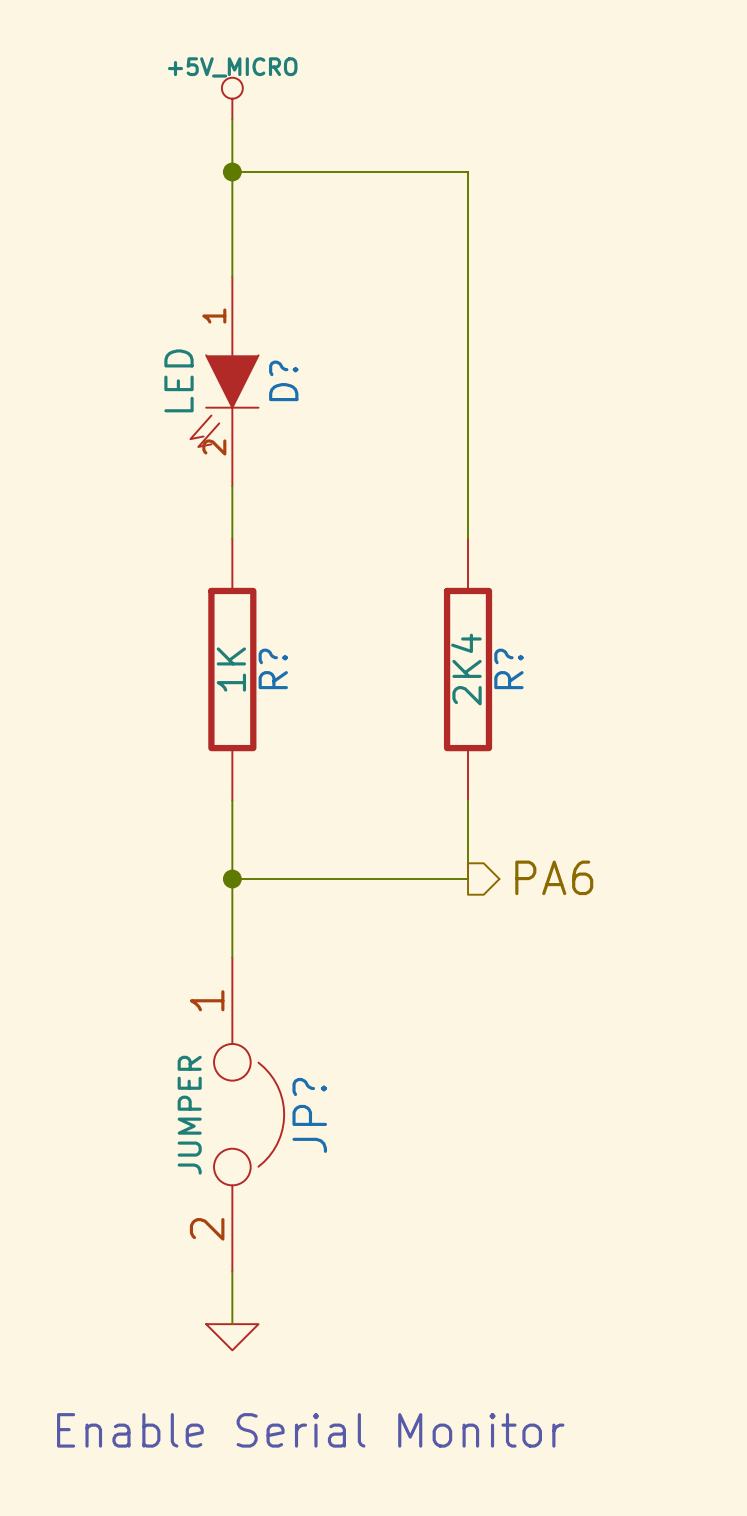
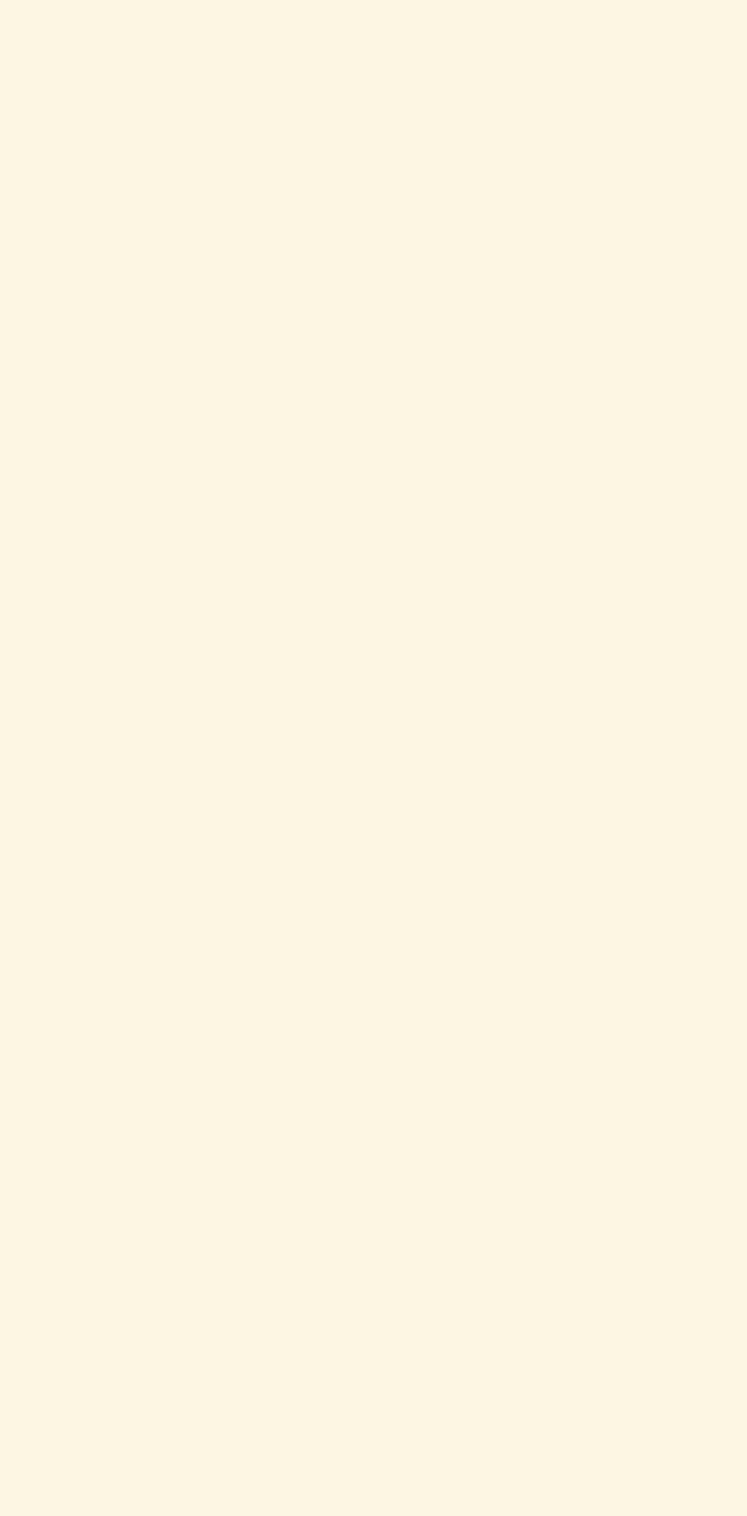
power symbol: +5V_MICRO (232, 98) -> none
wire: (232, 119) (232, 276) -> none
wire: (232, 172) (468, 172) (468, 538) -> none
junction: (232, 172) -> none
D?: LED (224, 381) -> none
wire: (232, 486) (232, 538) -> none
R?: 1K (232, 669) -> none
R?: 2K4 (468, 669) -> none
wire: (232, 800) (232, 957) -> none
wire: (468, 800) (468, 879) (232, 879) -> none
hierarchical label: PA6 (554, 877) -> none
junction: (232, 879) -> none
JP?: JUMPER (249, 1114) -> none
wire: (232, 1271) (232, 1324) -> none
power symbol: (232, 1337) -> none
text: Enable Serial Monitor (310, 1430) -> none

